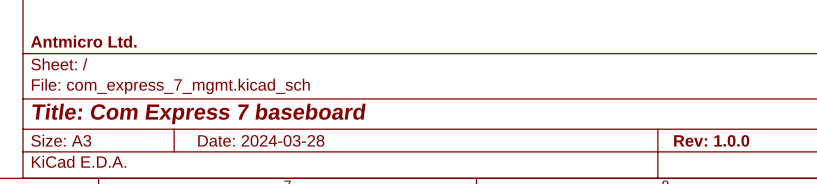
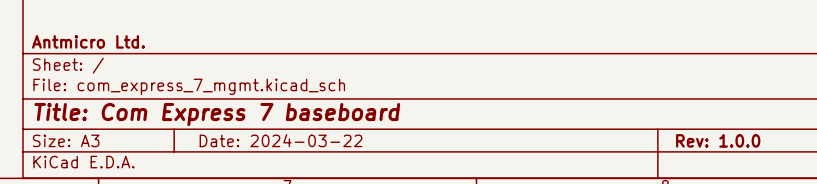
title block: Date: 2024-03-28 (261, 140) -> Date: 2024-03-22 (281, 140)

